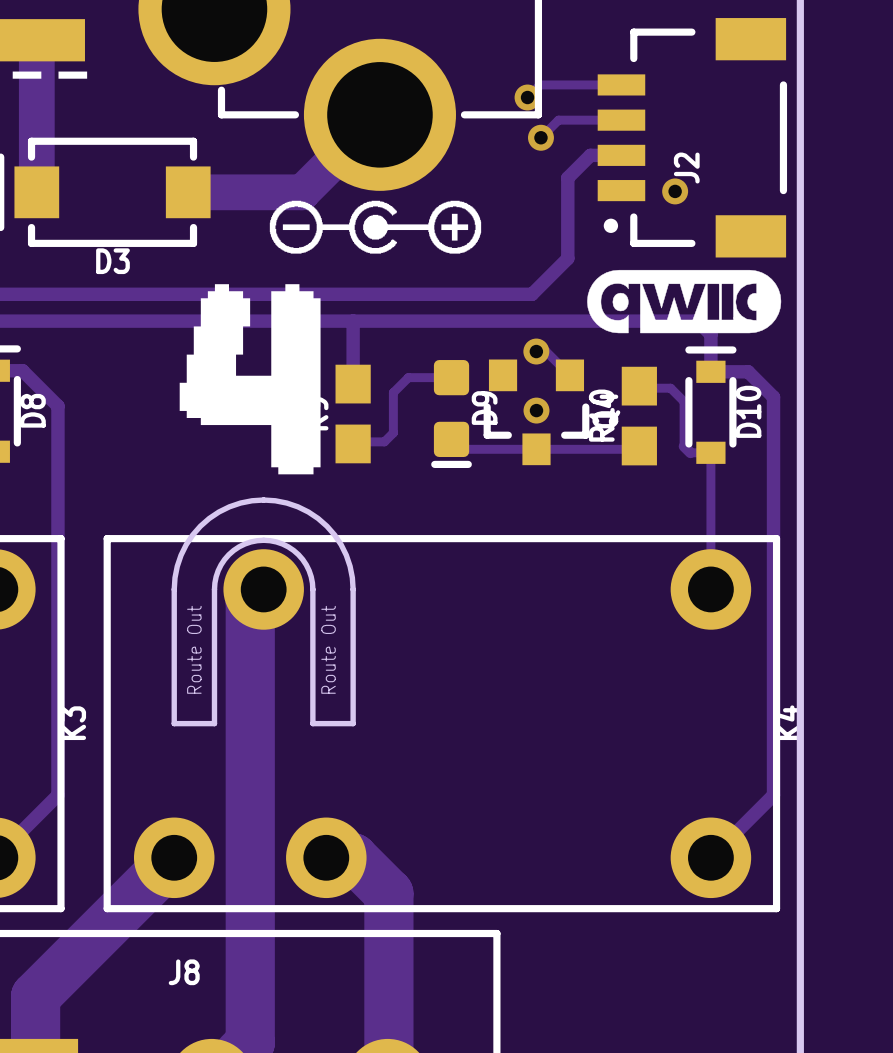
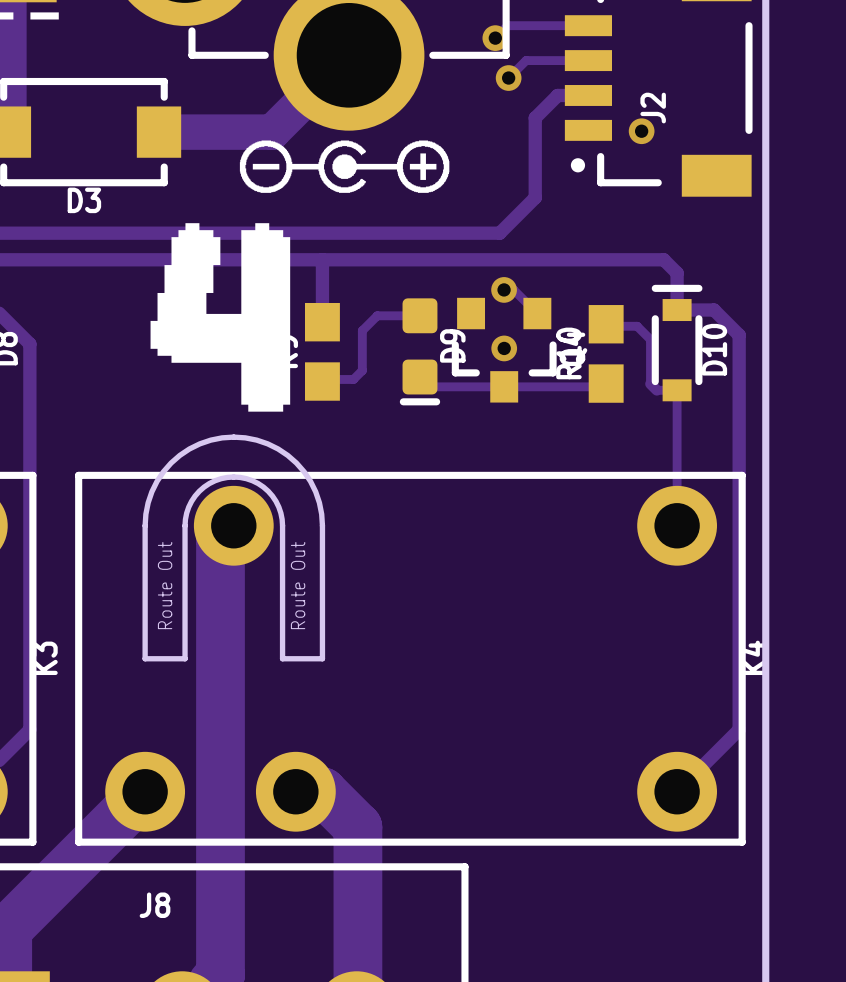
drawing: [587, 269, 782, 334] -> none

